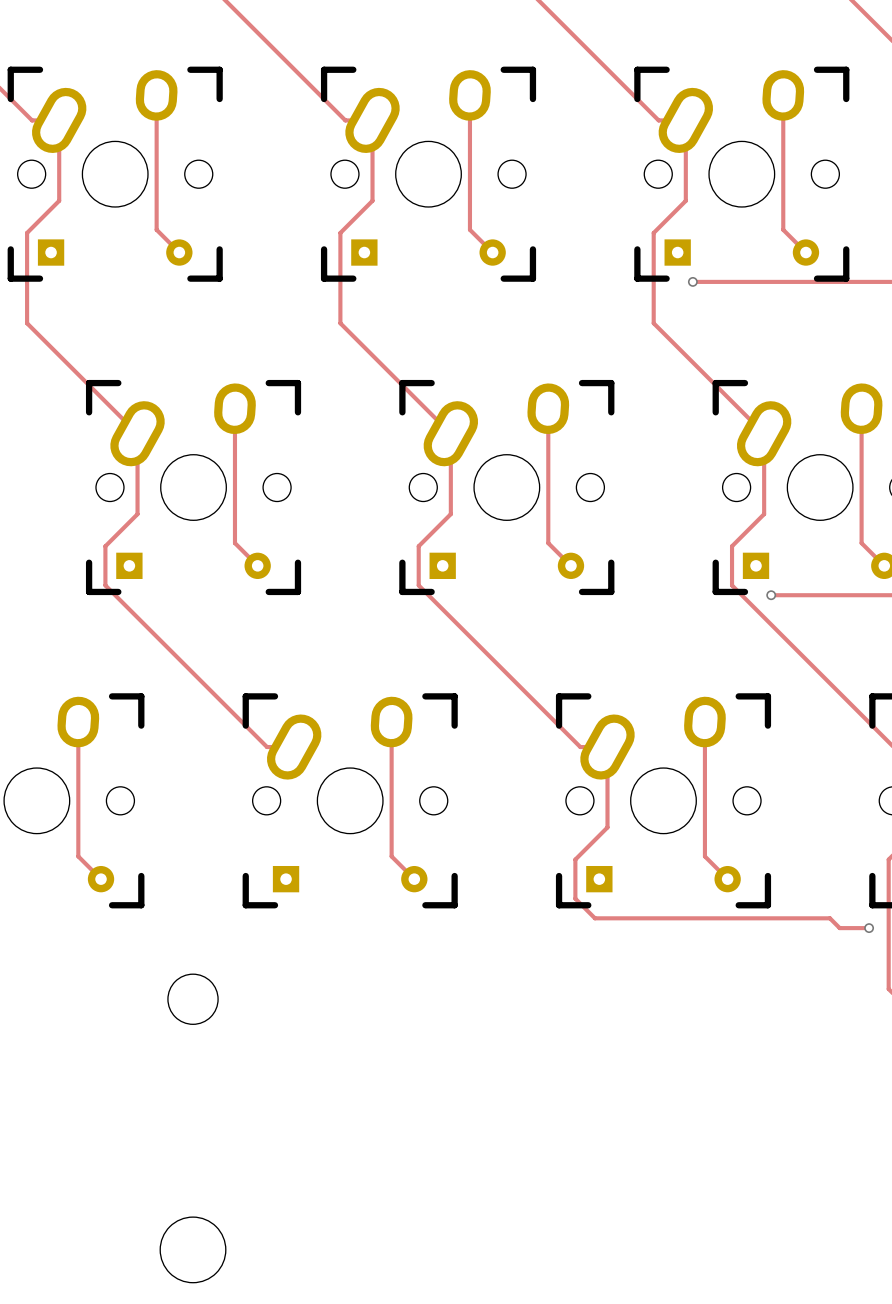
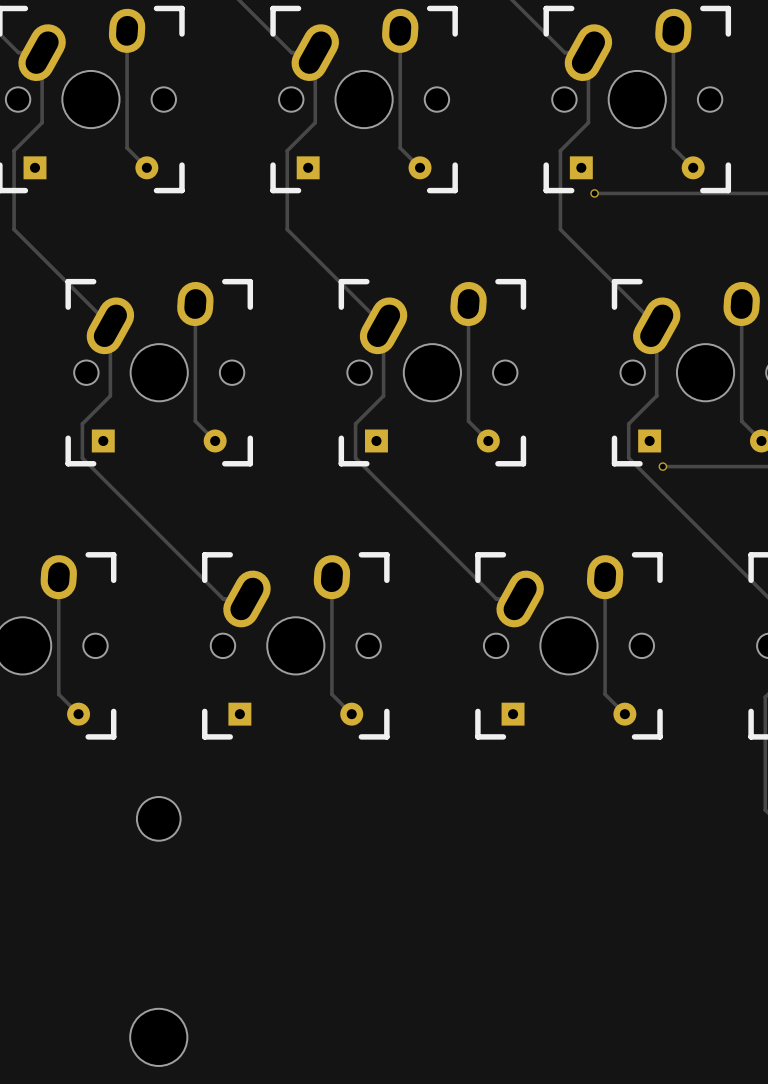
track: (607, 747) (607, 827) (575, 859) (575, 898) (594, 918) (829, 918) (839, 928) (869, 928) -> none
via: (869, 928) -> none

